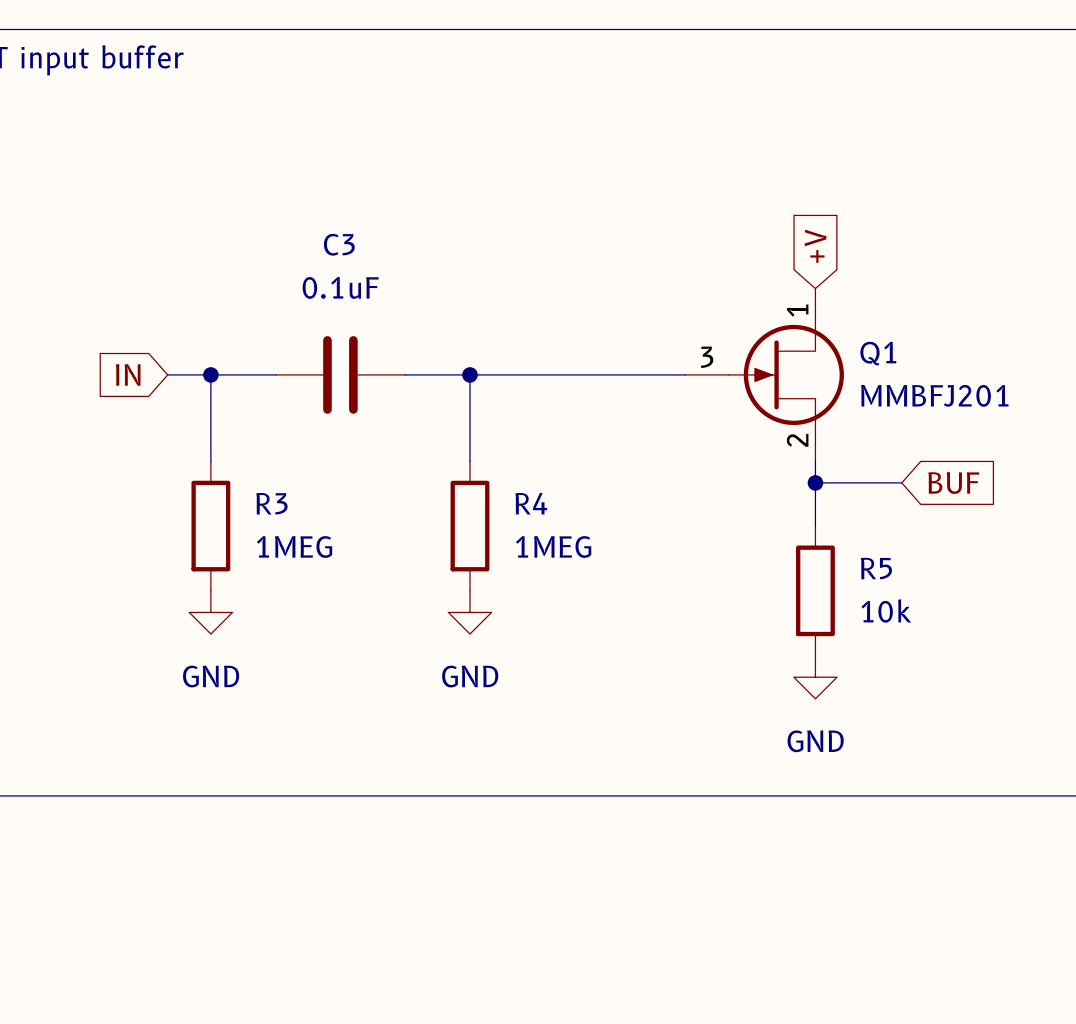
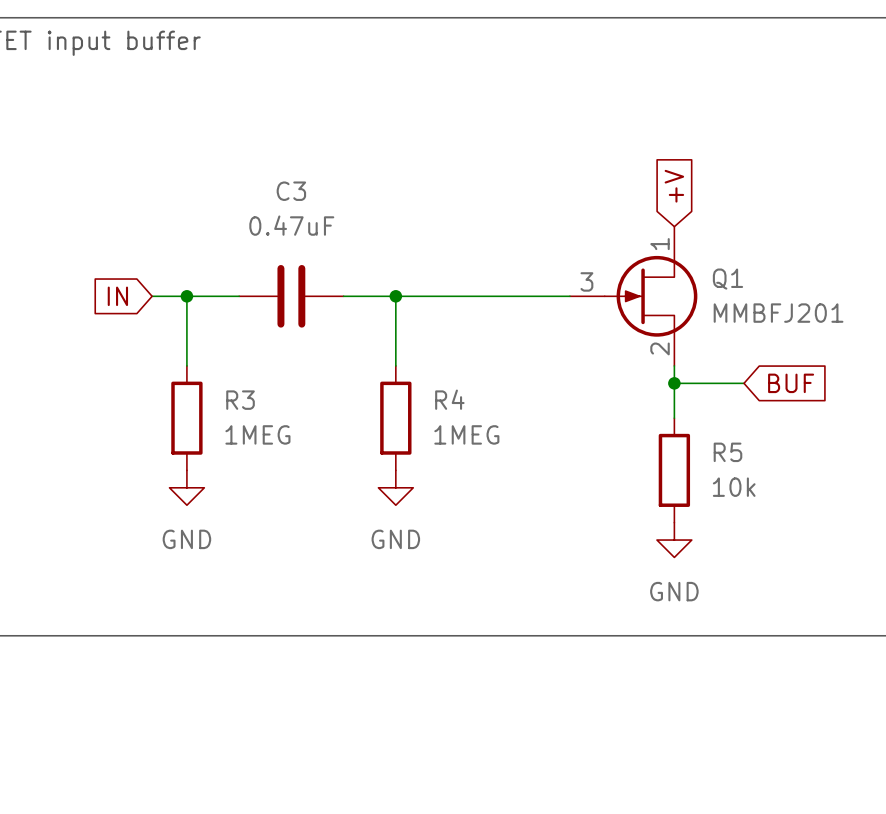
C3 value: 0.1uF (340, 287) -> 0.47uF (291, 225)

